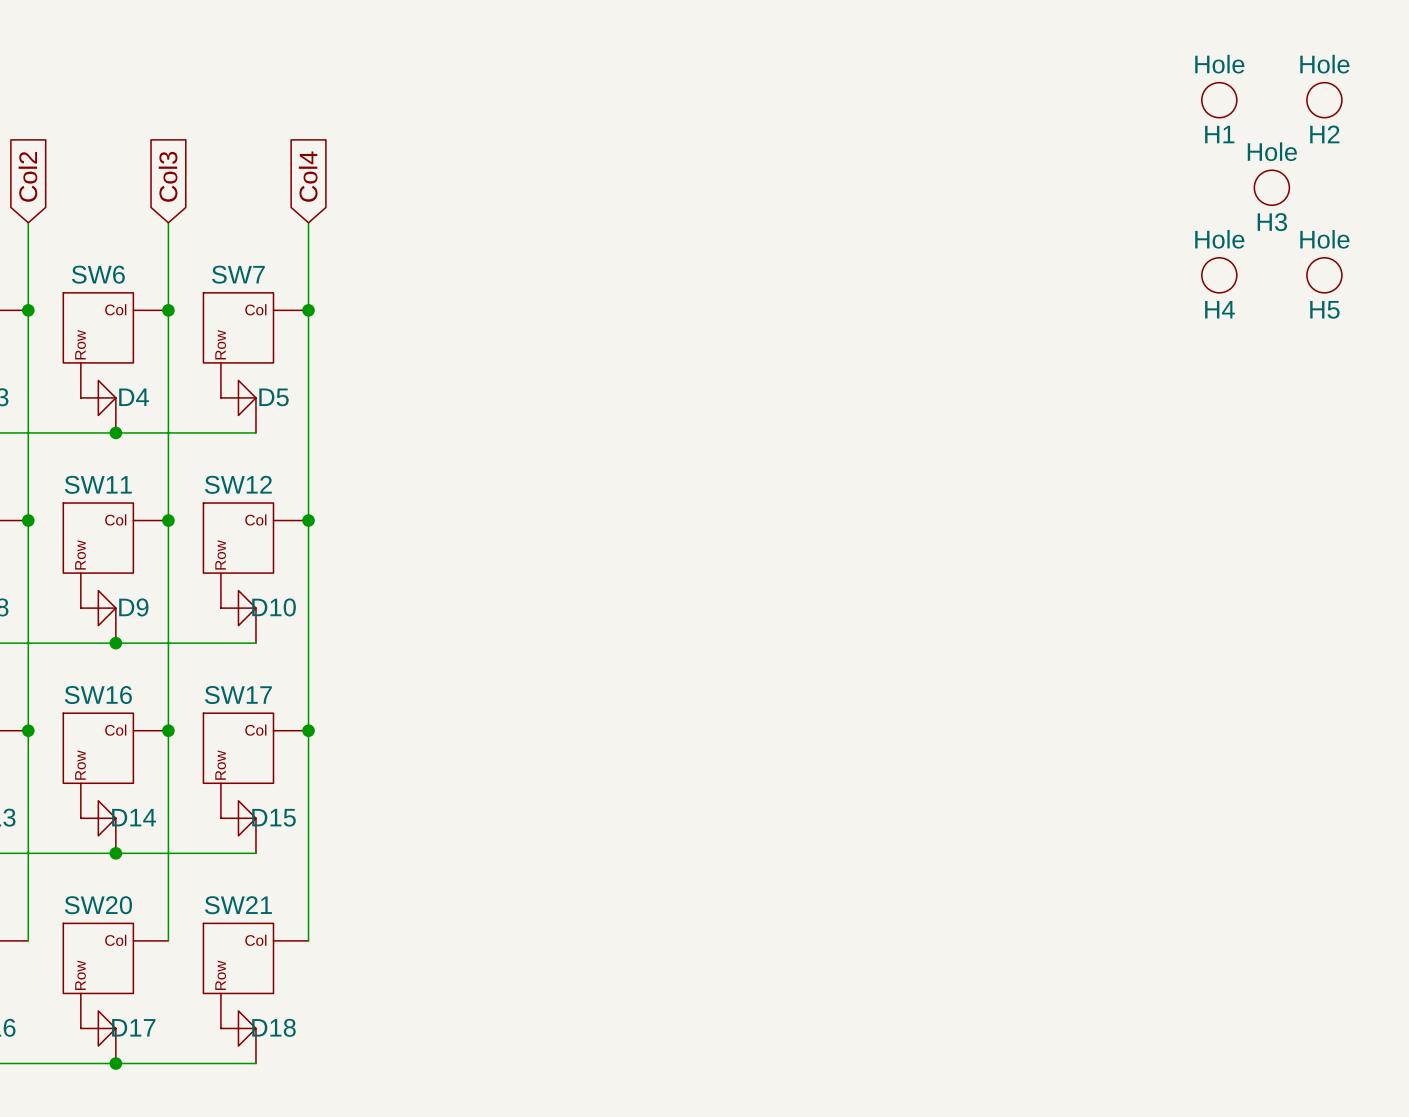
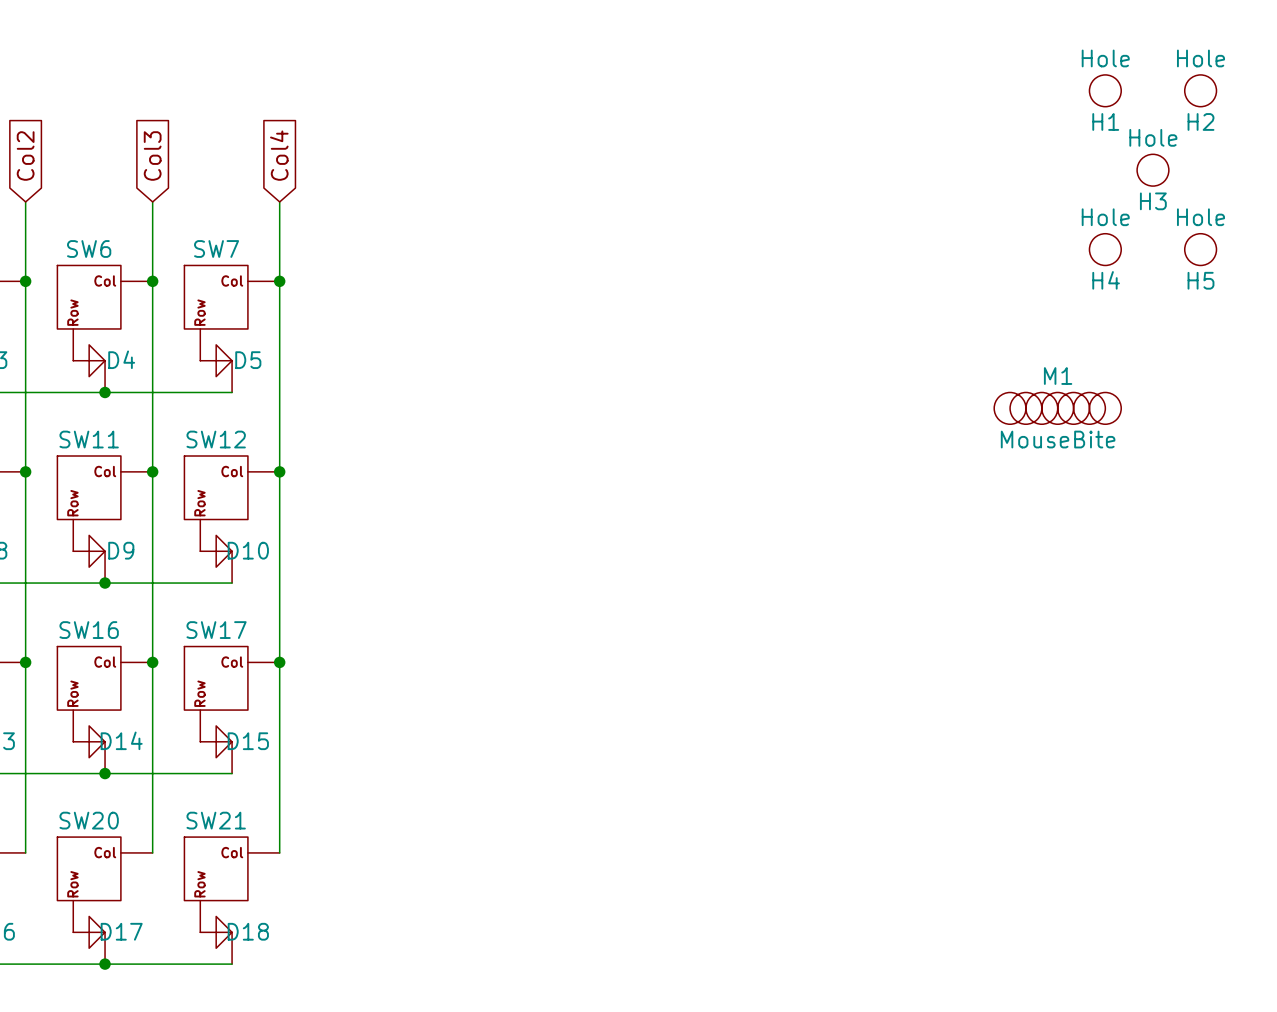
M1: none -> MouseBite (1057, 408)

